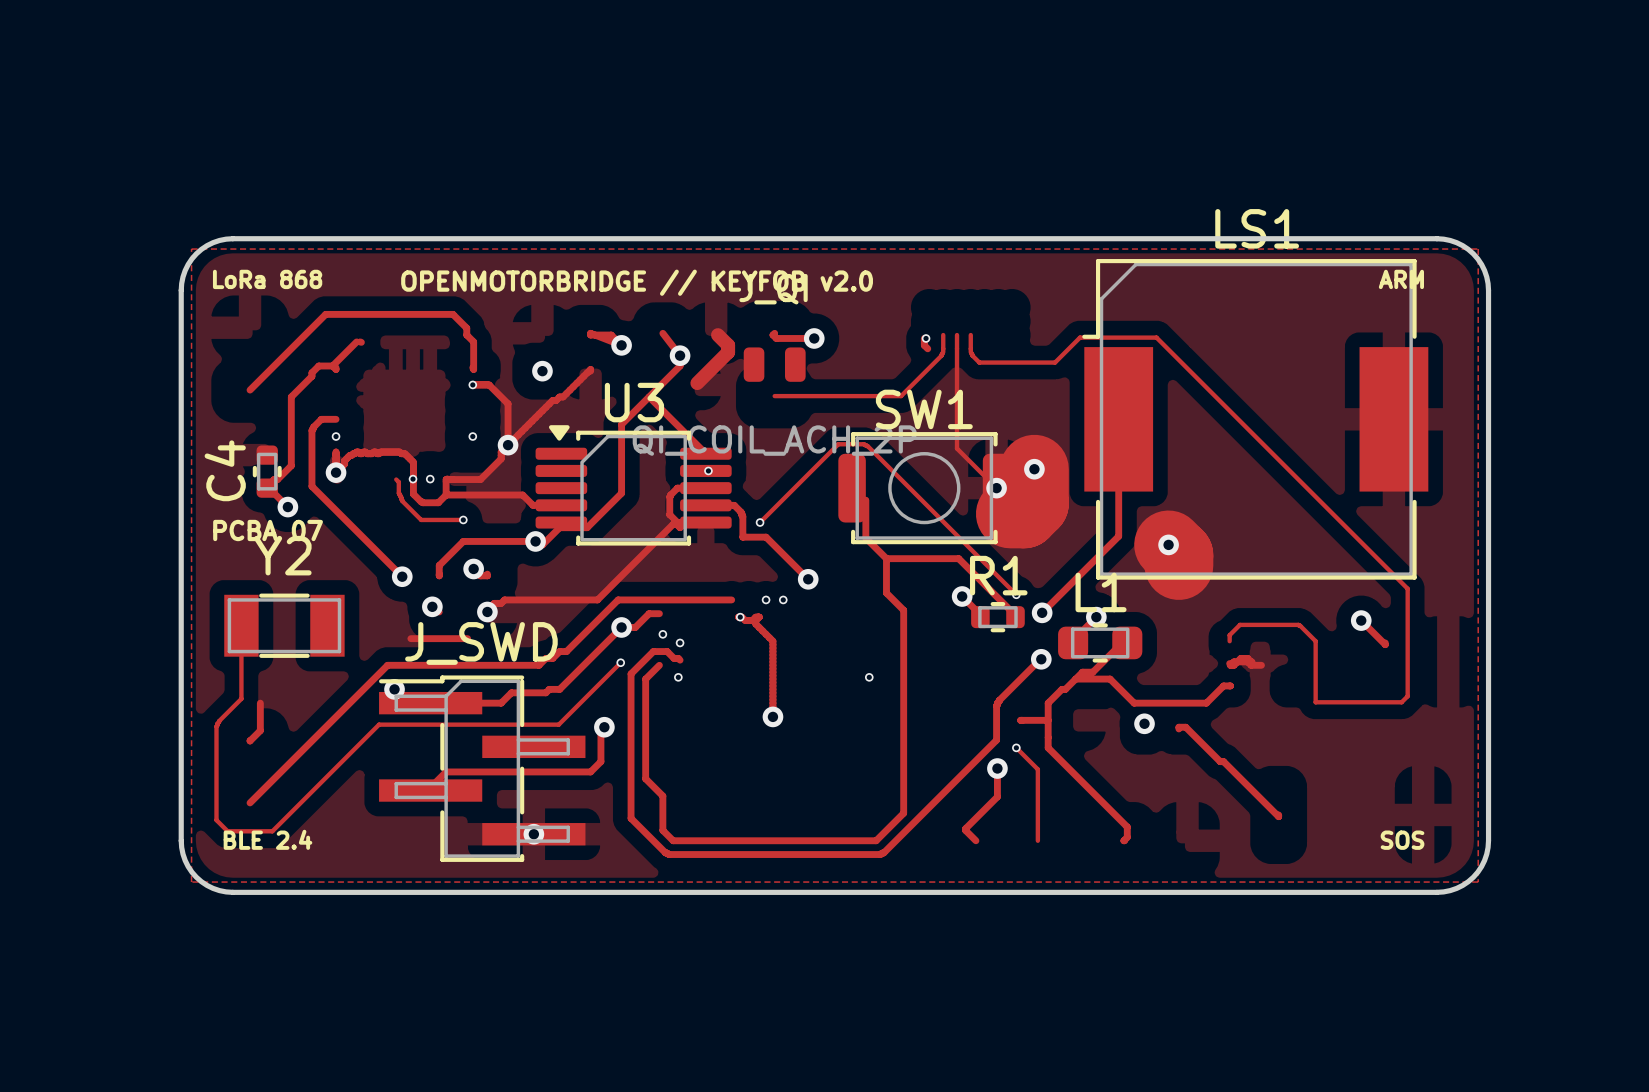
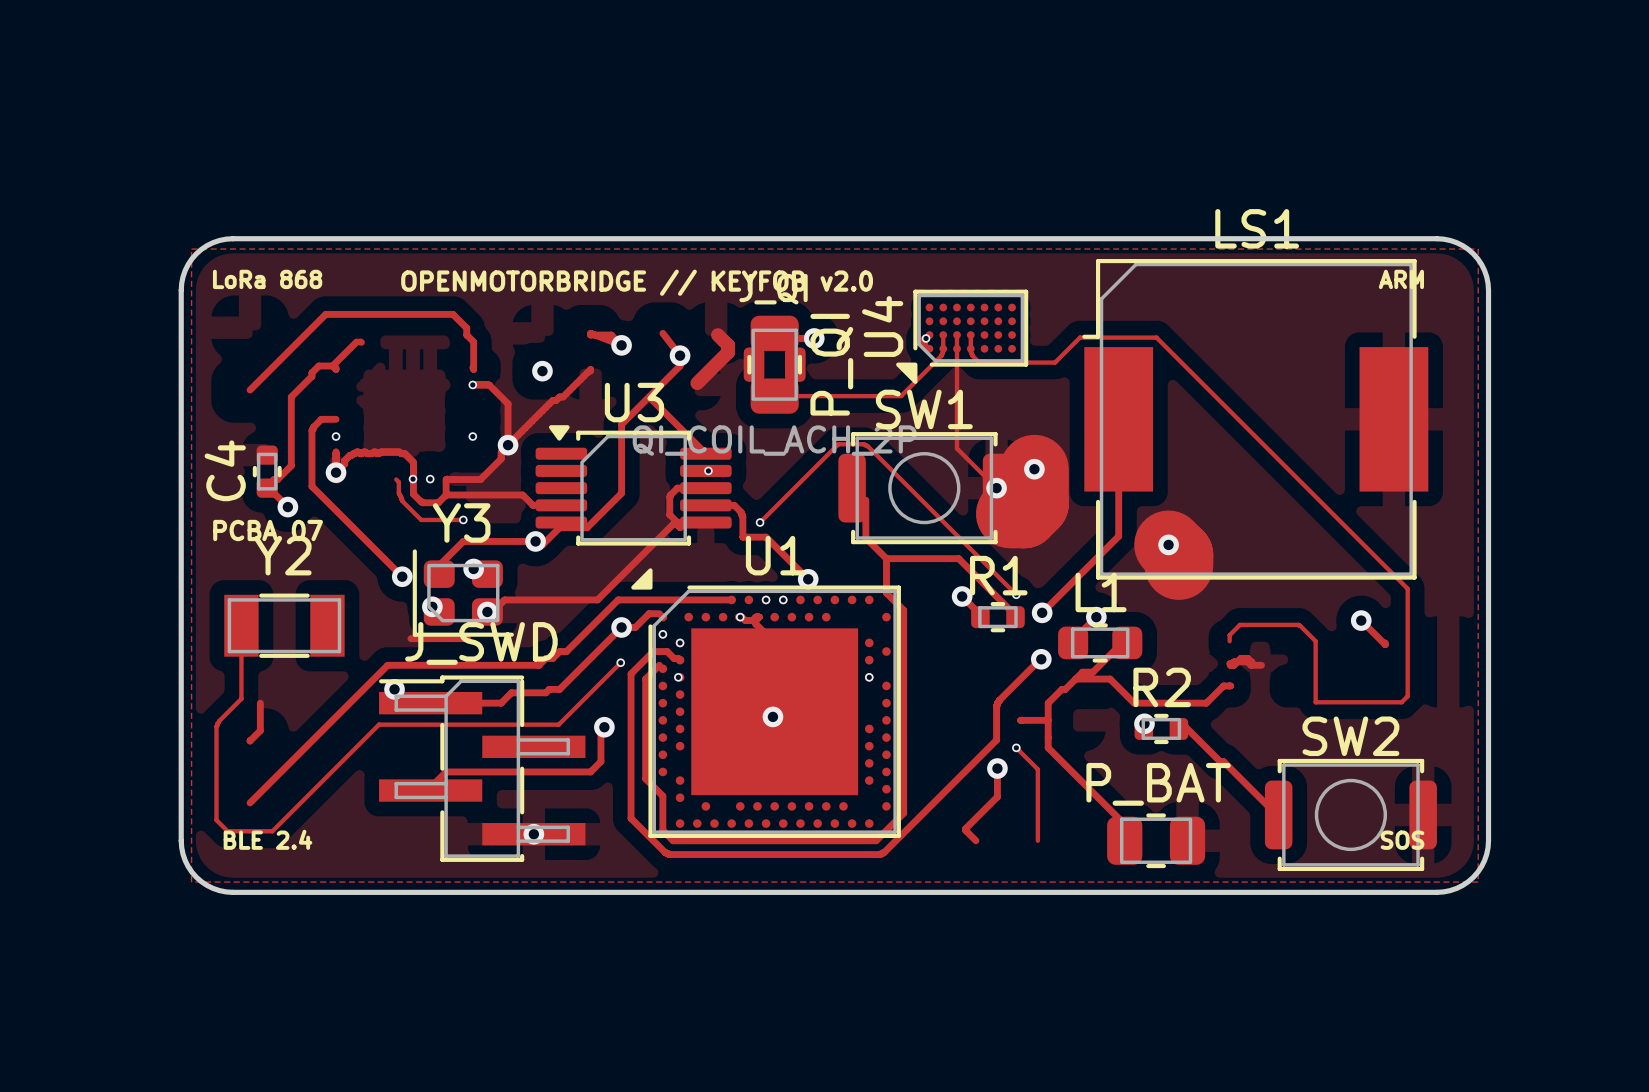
U4: none -> (962, 336)
P_QI: none -> (774, 364)
Y3: none -> (463, 593)
U1: none -> (766, 703)
R2: none -> (1161, 728)
SW2: none -> (1350, 814)
P_BAT: none -> (1156, 840)

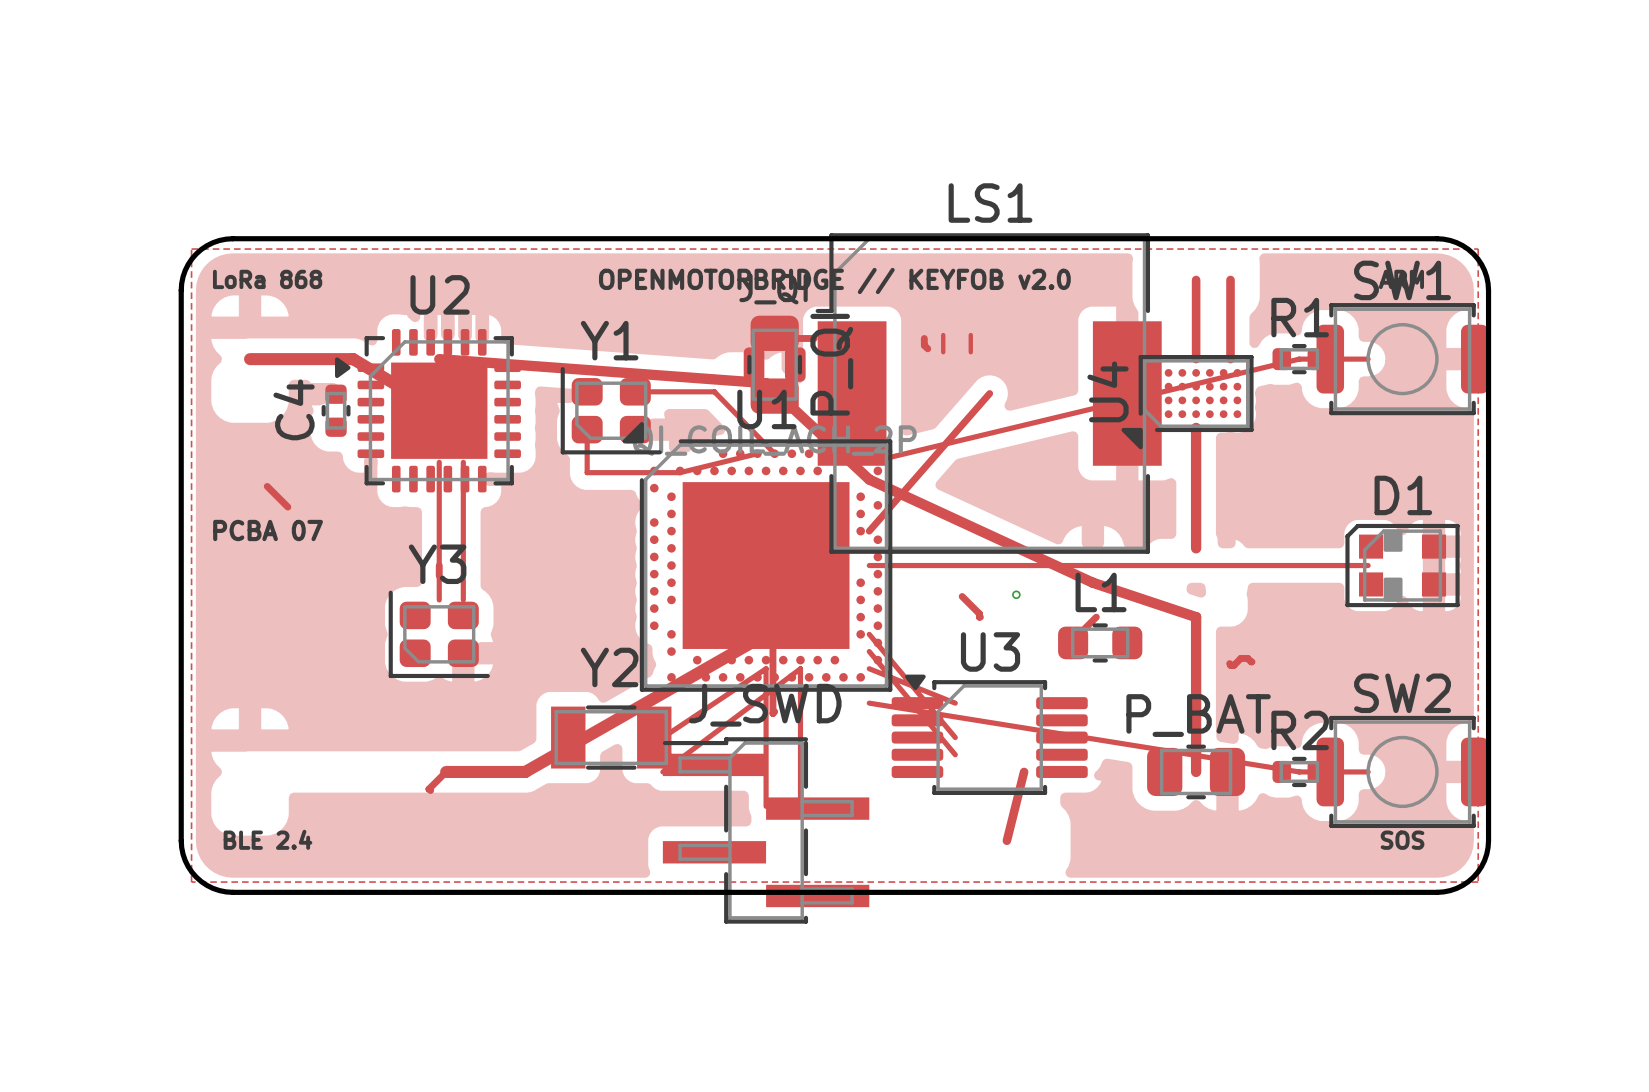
track: none -> (1196, 280) (1196, 359)
track: none -> (1230, 280) (1230, 359)
text position: OPENMOTORBRIDGE // KEYFOB v2.0 (637, 282) -> OPENMOTORBRIDGE // KEYFOB v2.0 (834, 280)
track: (590, 333) (590, 335) (611, 335) (621, 345) (590, 333) -> none
track: (662, 333) (680, 355) (680, 366) (621, 424) (621, 493) (587, 527) (559, 527) (542, 544) (539, 544) -> none
track: (717, 335) (728, 345) (728, 352) (697, 383) -> none
track: (957, 335) (957, 448) (996, 488) -> none
U4 position: (962, 336) -> (1187, 402)
via: (814, 338) -> none
via: (926, 338) -> none
track: (356, 341) (332, 366) -> none
track: (360, 341) (361, 342) -> none
via: (621, 345) -> none
track: (942, 353) (901, 396) (774, 396) -> none
track: (971, 353) (979, 362) (1055, 362) (1080, 337) (1156, 337) (1407, 588) (1407, 696) (1401, 702) (1315, 702) (1315, 641) (1298, 624) (1239, 624) (1229, 635) (1229, 641) -> none
via: (680, 355) -> none
track: none -> (250, 359) (353, 359) (439, 410)
track: none -> (439, 359) (766, 383) (869, 479) (1092, 582) (1196, 617) (1196, 771)
track: none -> (1368, 359) (1299, 359) (869, 462)
track: (332, 366) (336, 369) (336, 367) -> none
track: (332, 366) (318, 366) (311, 372) (311, 376) (291, 396) (291, 465) (277, 479) (274, 479) (267, 488) -> none
track: (472, 367) (473, 369) (473, 341) (466, 335) (466, 328) (453, 314) (325, 314) (250, 390) -> none
via: (542, 371) -> none
track: (590, 371) (590, 369) (563, 396) (552, 400) (501, 452) (501, 458) (480, 479) (447, 479) -> none
track: (472, 384) (489, 384) (508, 403) (508, 445) -> none
via: (472, 384) -> none
track: none -> (635, 391) (714, 391) (774, 453)
track: none -> (989, 393) (869, 531)
track: (649, 396) (705, 453) -> none
U2: none -> (427, 410)
Y1: none -> (611, 410)
track: (336, 419) (321, 419) (311, 430) (311, 486) (402, 576) -> none
track: (1118, 419) (1118, 536) (1042, 612) -> none
LS1 position: (1255, 419) -> (988, 393)
track: none -> (1196, 427) (1196, 548)
track: none -> (587, 429) (587, 472) (680, 472) (757, 453)
via: (336, 436) -> none
via: (472, 436) -> none
via: (508, 445) -> none
track: (336, 452) (336, 472) (344, 464) (344, 460) (356, 452) (360, 453) (363, 452) (367, 453) (373, 452) (377, 453) (380, 452) (404, 453) (413, 462) (413, 494) (421, 501) (438, 502) (446, 495) -> none
track: none -> (463, 462) (463, 599)
track: (1010, 469) (1034, 469) (1034, 503) (1024, 513) (1010, 513) -> none
via: (1034, 469) -> none
via: (708, 470) -> none
C4 position: (267, 471) -> (336, 410)
via: (336, 472) -> none
track: (396, 479) (398, 482) (398, 493) (402, 501) (421, 519) (463, 519) -> none
via: (413, 479) -> none
via: (430, 479) -> none
track: (447, 479) (446, 481) (446, 495) -> none
U3 position: (633, 485) -> (989, 734)
track: (705, 488) (677, 488) (669, 496) (669, 514) (677, 522) (705, 522) -> none
SW1 position: (924, 488) -> (1402, 359)
via: (996, 488) -> none
track: (446, 495) (522, 495) (533, 505) (561, 505) -> none
track: (865, 500) (865, 538) (886, 558) -> none
track: (705, 505) (734, 505) (742, 516) (742, 537) (766, 537) (808, 579) -> none
via: (287, 507) -> none
via: (463, 519) -> none
track: (760, 522) (838, 444) (864, 444) (1016, 594) -> none
via: (760, 522) -> none
track: (700, 524) (683, 524) (680, 527) (676, 524) (673, 524) (597, 599) (504, 599) (501, 603) (494, 603) (487, 611) -> none
track: (535, 541) (463, 541) (439, 565) -> (439, 462) (439, 565)
via: (535, 541) -> none
track: (1168, 544) (1178, 555) (1178, 565) -> none
via: (1168, 544) -> none
track: (886, 558) (958, 558) (1015, 617) -> none
track: (886, 558) (886, 593) (903, 610) (903, 813) (876, 840) (673, 840) (662, 830) (662, 796) (645, 778) (645, 679) (659, 665) -> none
track: none -> (869, 565) (1368, 565)
D1: none -> (1402, 565)
via: (473, 568) -> none
track: none -> (439, 575) (439, 599)
via: (402, 576) -> none
via: (808, 579) -> none
Y3 position: (463, 593) -> (439, 634)
via: (962, 596) -> none
track: (731, 599) (618, 599) (566, 651) (559, 651) (552, 658) (545, 658) (539, 665) (387, 665) (250, 802) -> none
via: (766, 599) -> none
via: (783, 599) -> none
via: (432, 606) -> none
via: (487, 611) -> none
via: (1042, 612) -> none
track: (659, 613) (649, 613) (635, 627) (621, 627) (559, 689) (549, 689) (545, 692) (511, 692) (501, 703) (428, 703) -> none
via: (740, 617) -> none
R1 position: (997, 617) -> (1299, 359)
via: (1096, 617) -> none
track: (1361, 620) (1385, 644) (1385, 642) -> none
via: (1361, 620) -> none
track: (241, 625) (241, 698) (219, 721) (216, 726) (216, 820) (227, 831) (272, 831) (379, 724) (558, 724) (620, 662) -> none
Y2 position: (284, 625) -> (611, 737)
via: (621, 627) -> none
via: (662, 634) -> none
track: none -> (869, 634) (955, 737)
track: (410, 638) (467, 638) -> none
via: (680, 642) -> none
track: (1127, 642) (1127, 644) (1120, 644) (1092, 672) (1082, 672) (1048, 703) (1048, 747) (1127, 827) (1127, 837) (1124, 840) -> none
track: none -> (869, 651) (955, 754)
track: (1040, 659) (997, 703) (996, 740) (880, 854) (668, 854) (665, 852) (631, 818) (631, 673) (653, 651) (667, 651) (674, 658) (680, 660) -> none
via: (1041, 659) -> none
via: (620, 662) -> none
track: (1230, 665) (1233, 661) (1247, 661) (1251, 665) (1261, 665) -> none
track: none -> (869, 668) (955, 703)
via: (678, 677) -> none
via: (869, 677) -> none
track: (1075, 679) (1110, 679) (1134, 703) (1206, 703) (1223, 685) (1230, 685) -> none
via: (394, 689) -> none
track: (260, 703) (260, 730) (250, 740) -> none
U1 position: (766, 703) -> (757, 556)
track: none -> (869, 703) (1299, 771) (1368, 771)
via: (772, 716) -> none
track: (1020, 720) (1048, 720) -> none
via: (1144, 723) -> none
via: (604, 727) -> none
R2 position: (1161, 728) -> (1299, 771)
track: (1178, 728) (1178, 727) (1185, 727) (1278, 816) (1278, 814) -> none
track: (600, 730) (600, 761) (590, 771) (525, 771) -> (766, 634) (525, 771)
track: none -> (662, 737) (766, 668) (766, 806)
track: (1016, 747) (1037, 769) (1037, 840) -> none
via: (1016, 747) -> none
J_SWD position: (482, 768) -> (766, 830)
track: (997, 768) (997, 796) (965, 828) (975, 840) -> none
via: (997, 768) -> none
track width: thin (446, 771) (525, 771) -> thick (446, 771) (525, 771)
track: none -> (662, 771) (800, 668) (800, 806)
track: none -> (1024, 771) (1006, 840)
SW2 position: (1350, 814) -> (1402, 771)
via: (533, 834) -> none
P_BAT position: (1156, 840) -> (1196, 771)

